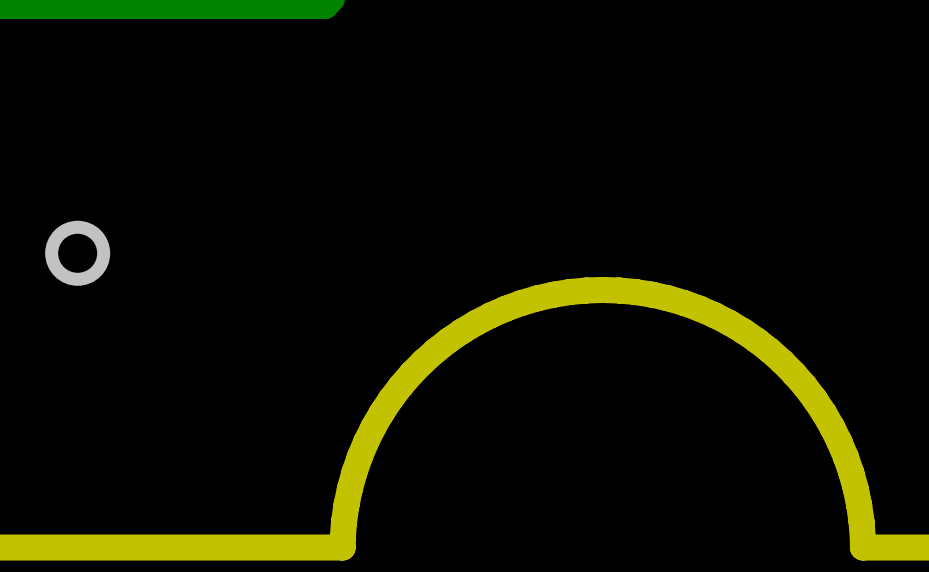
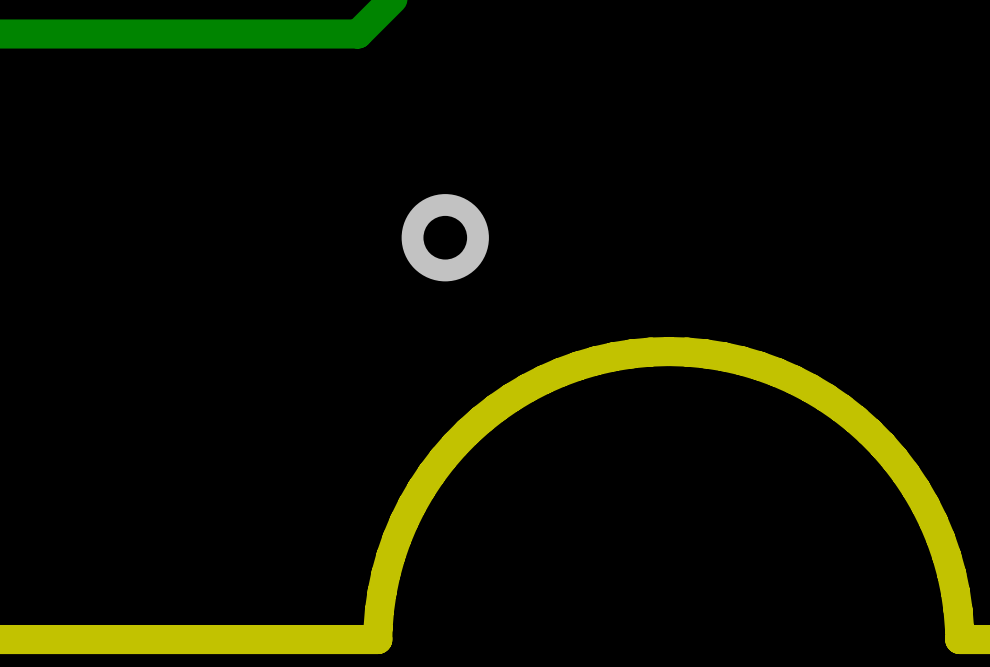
via: none -> (445, 237)
via: (77, 253) -> none

